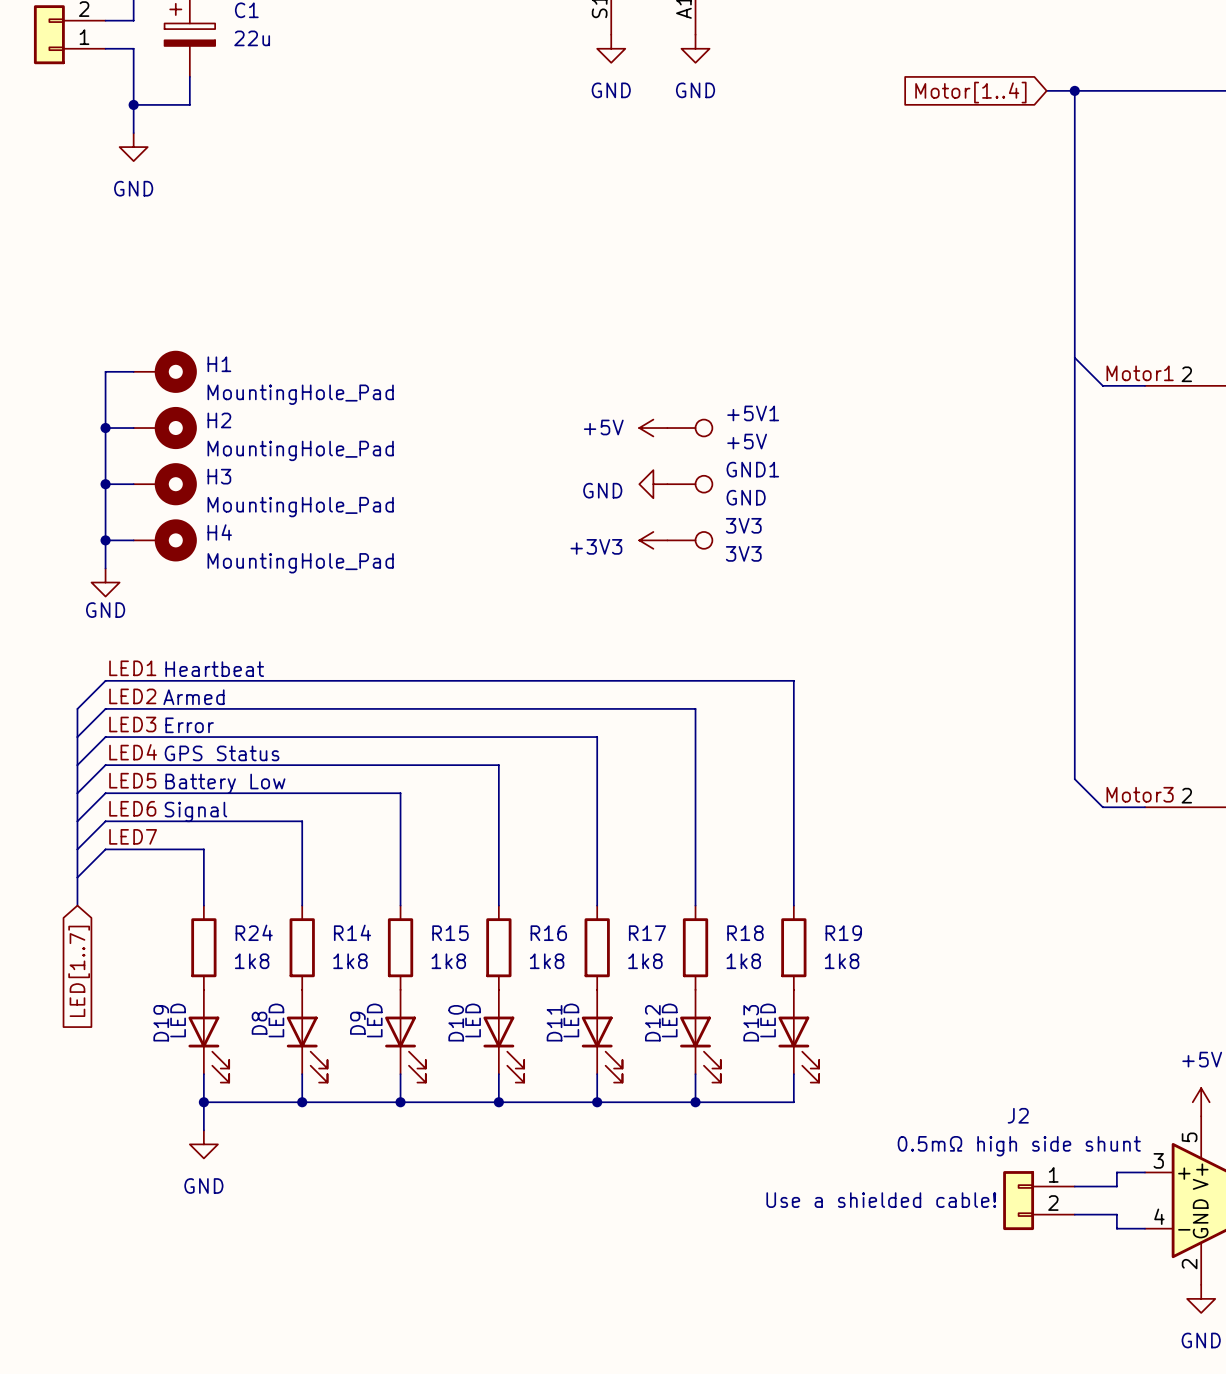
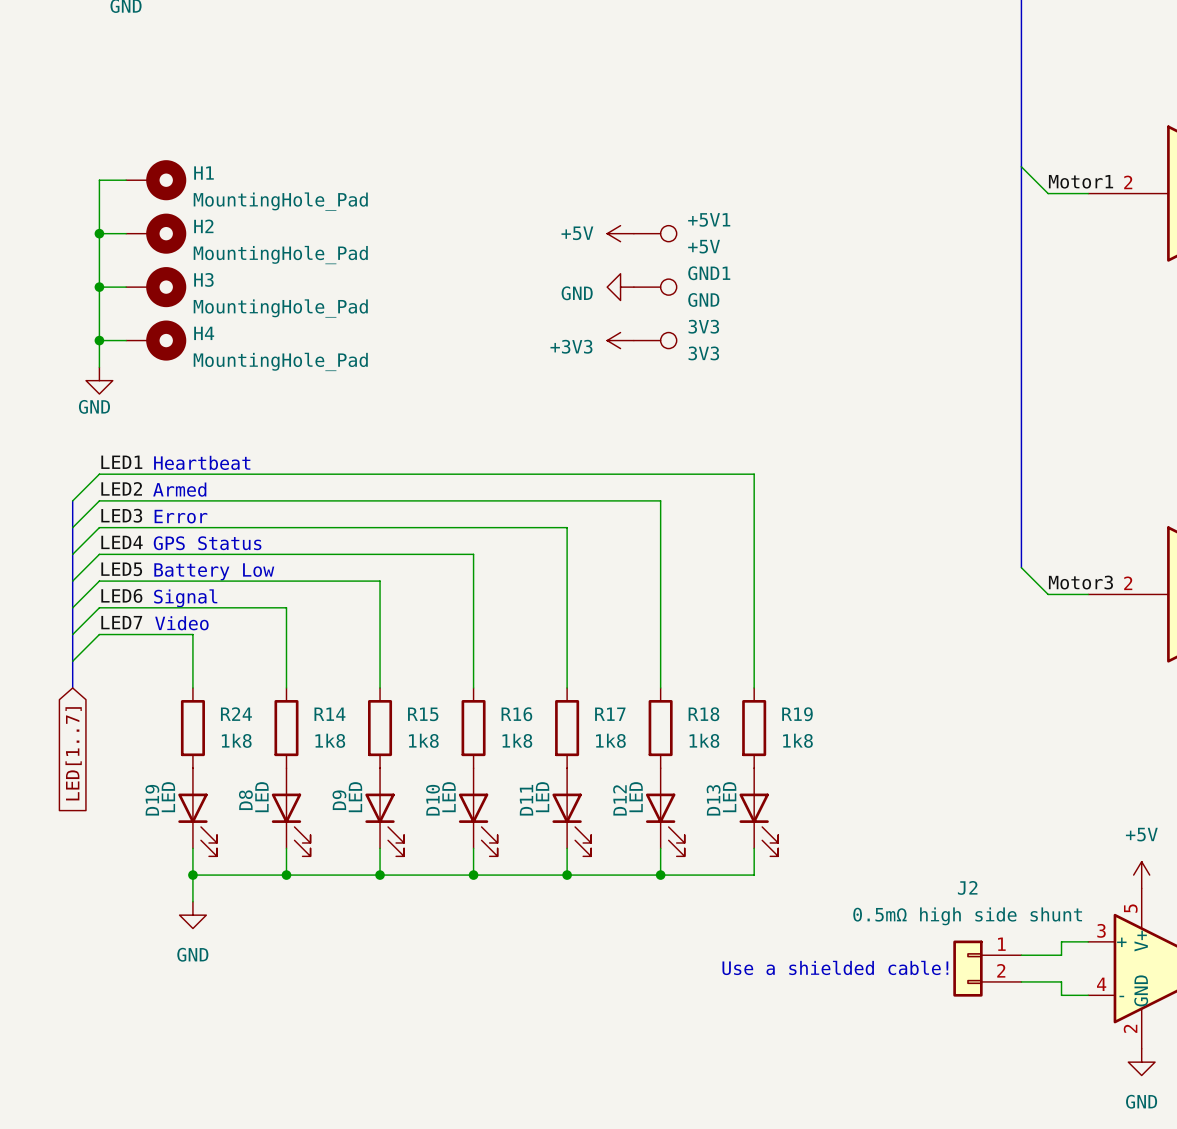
text: none -> Video (181, 623)

